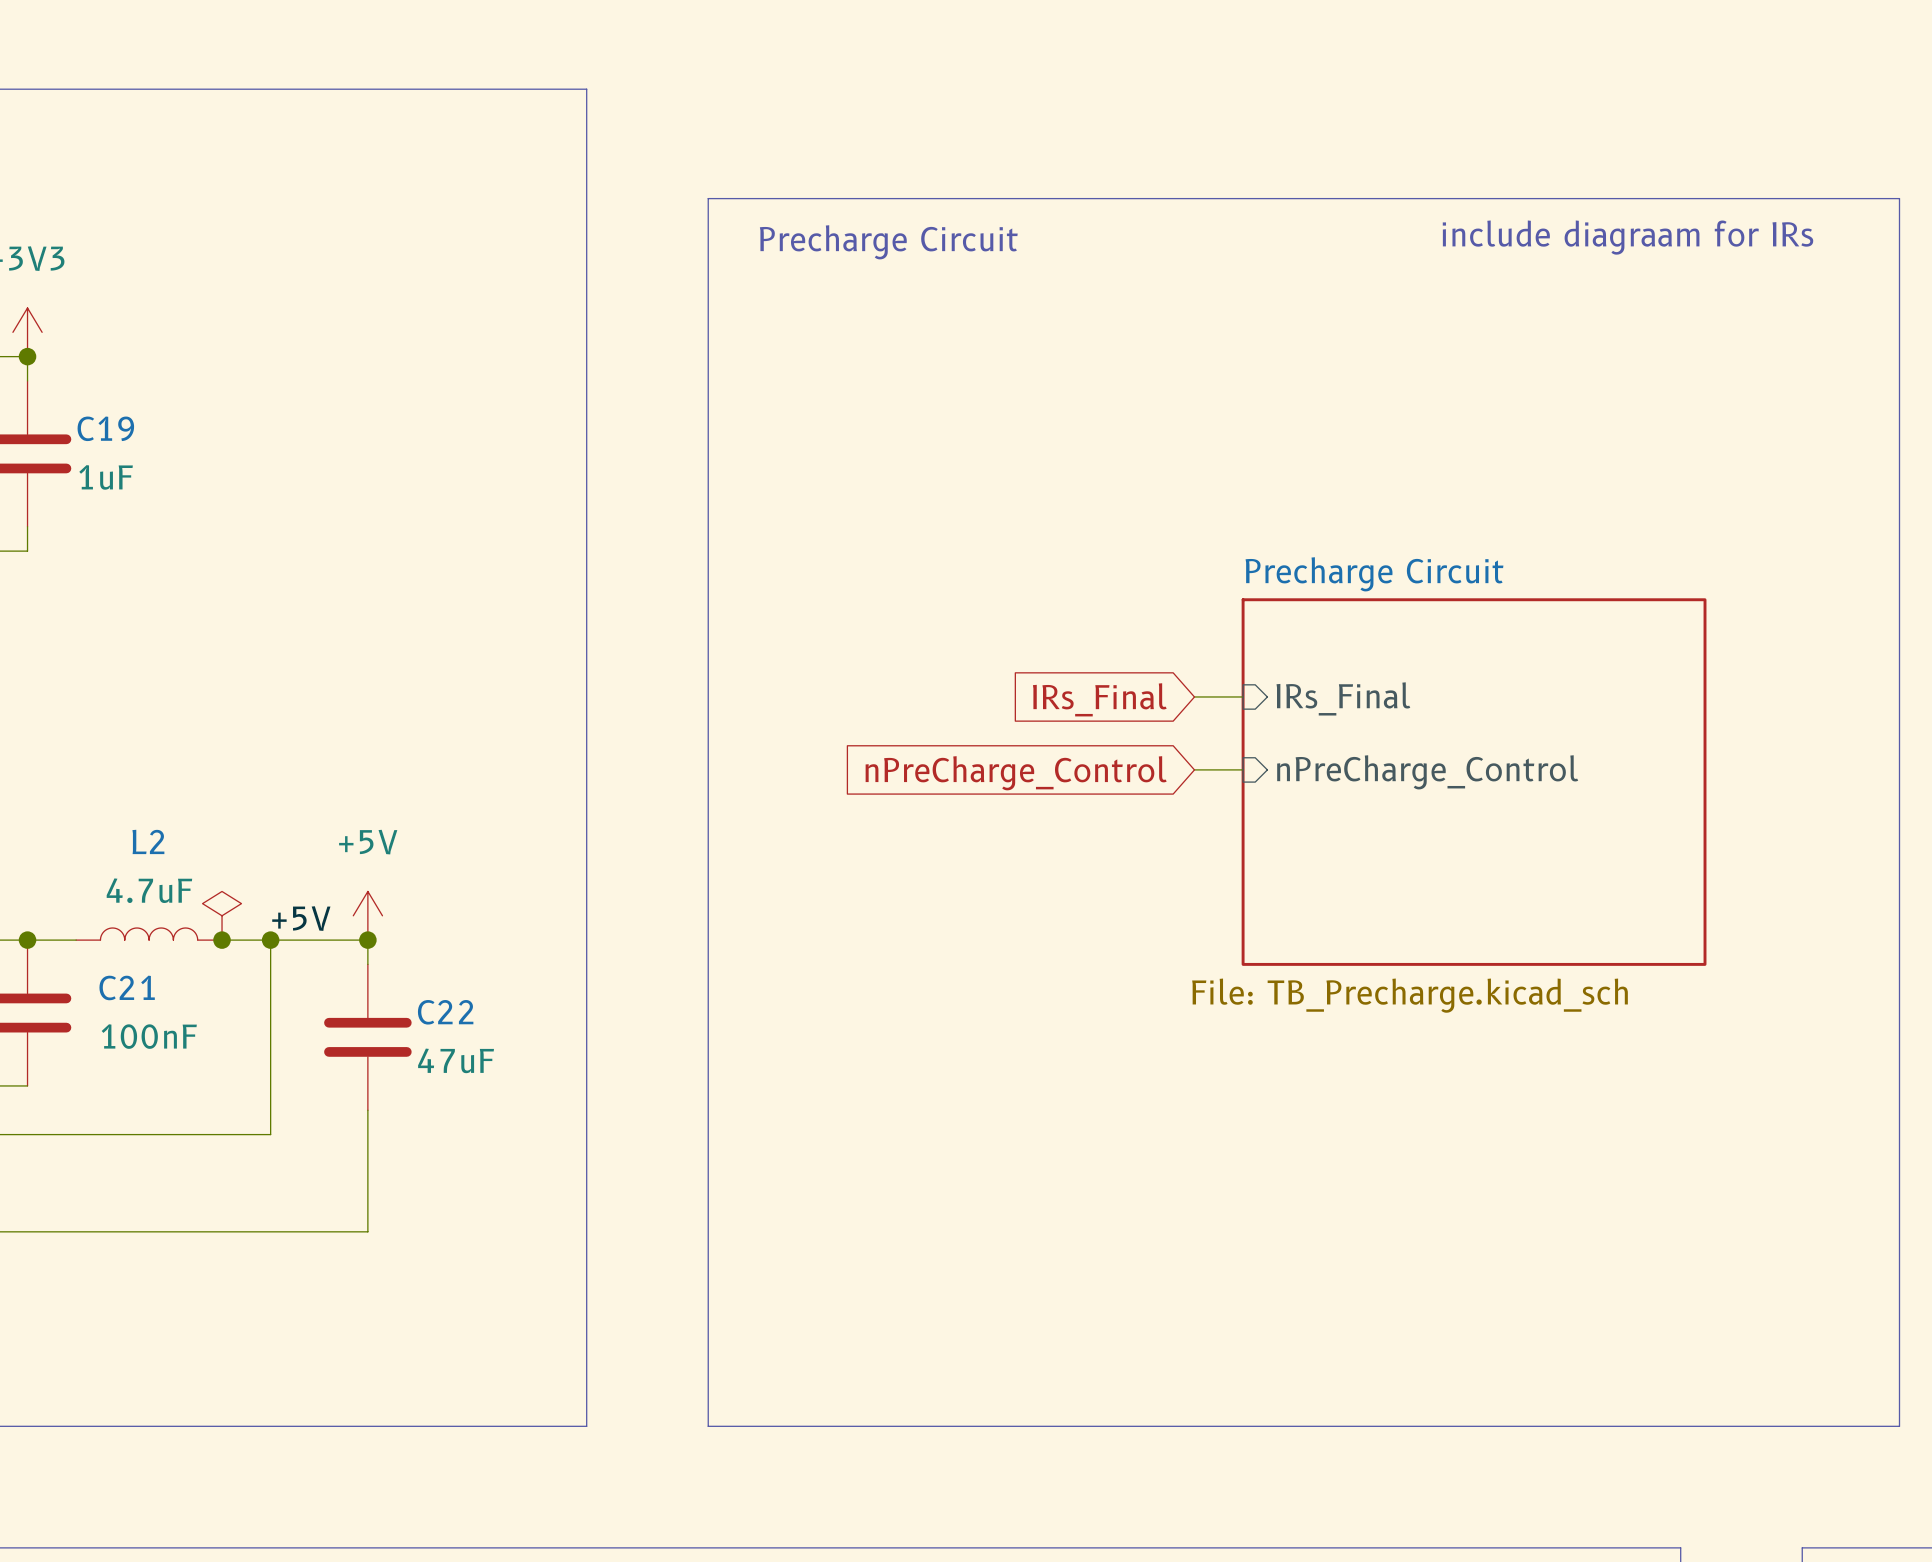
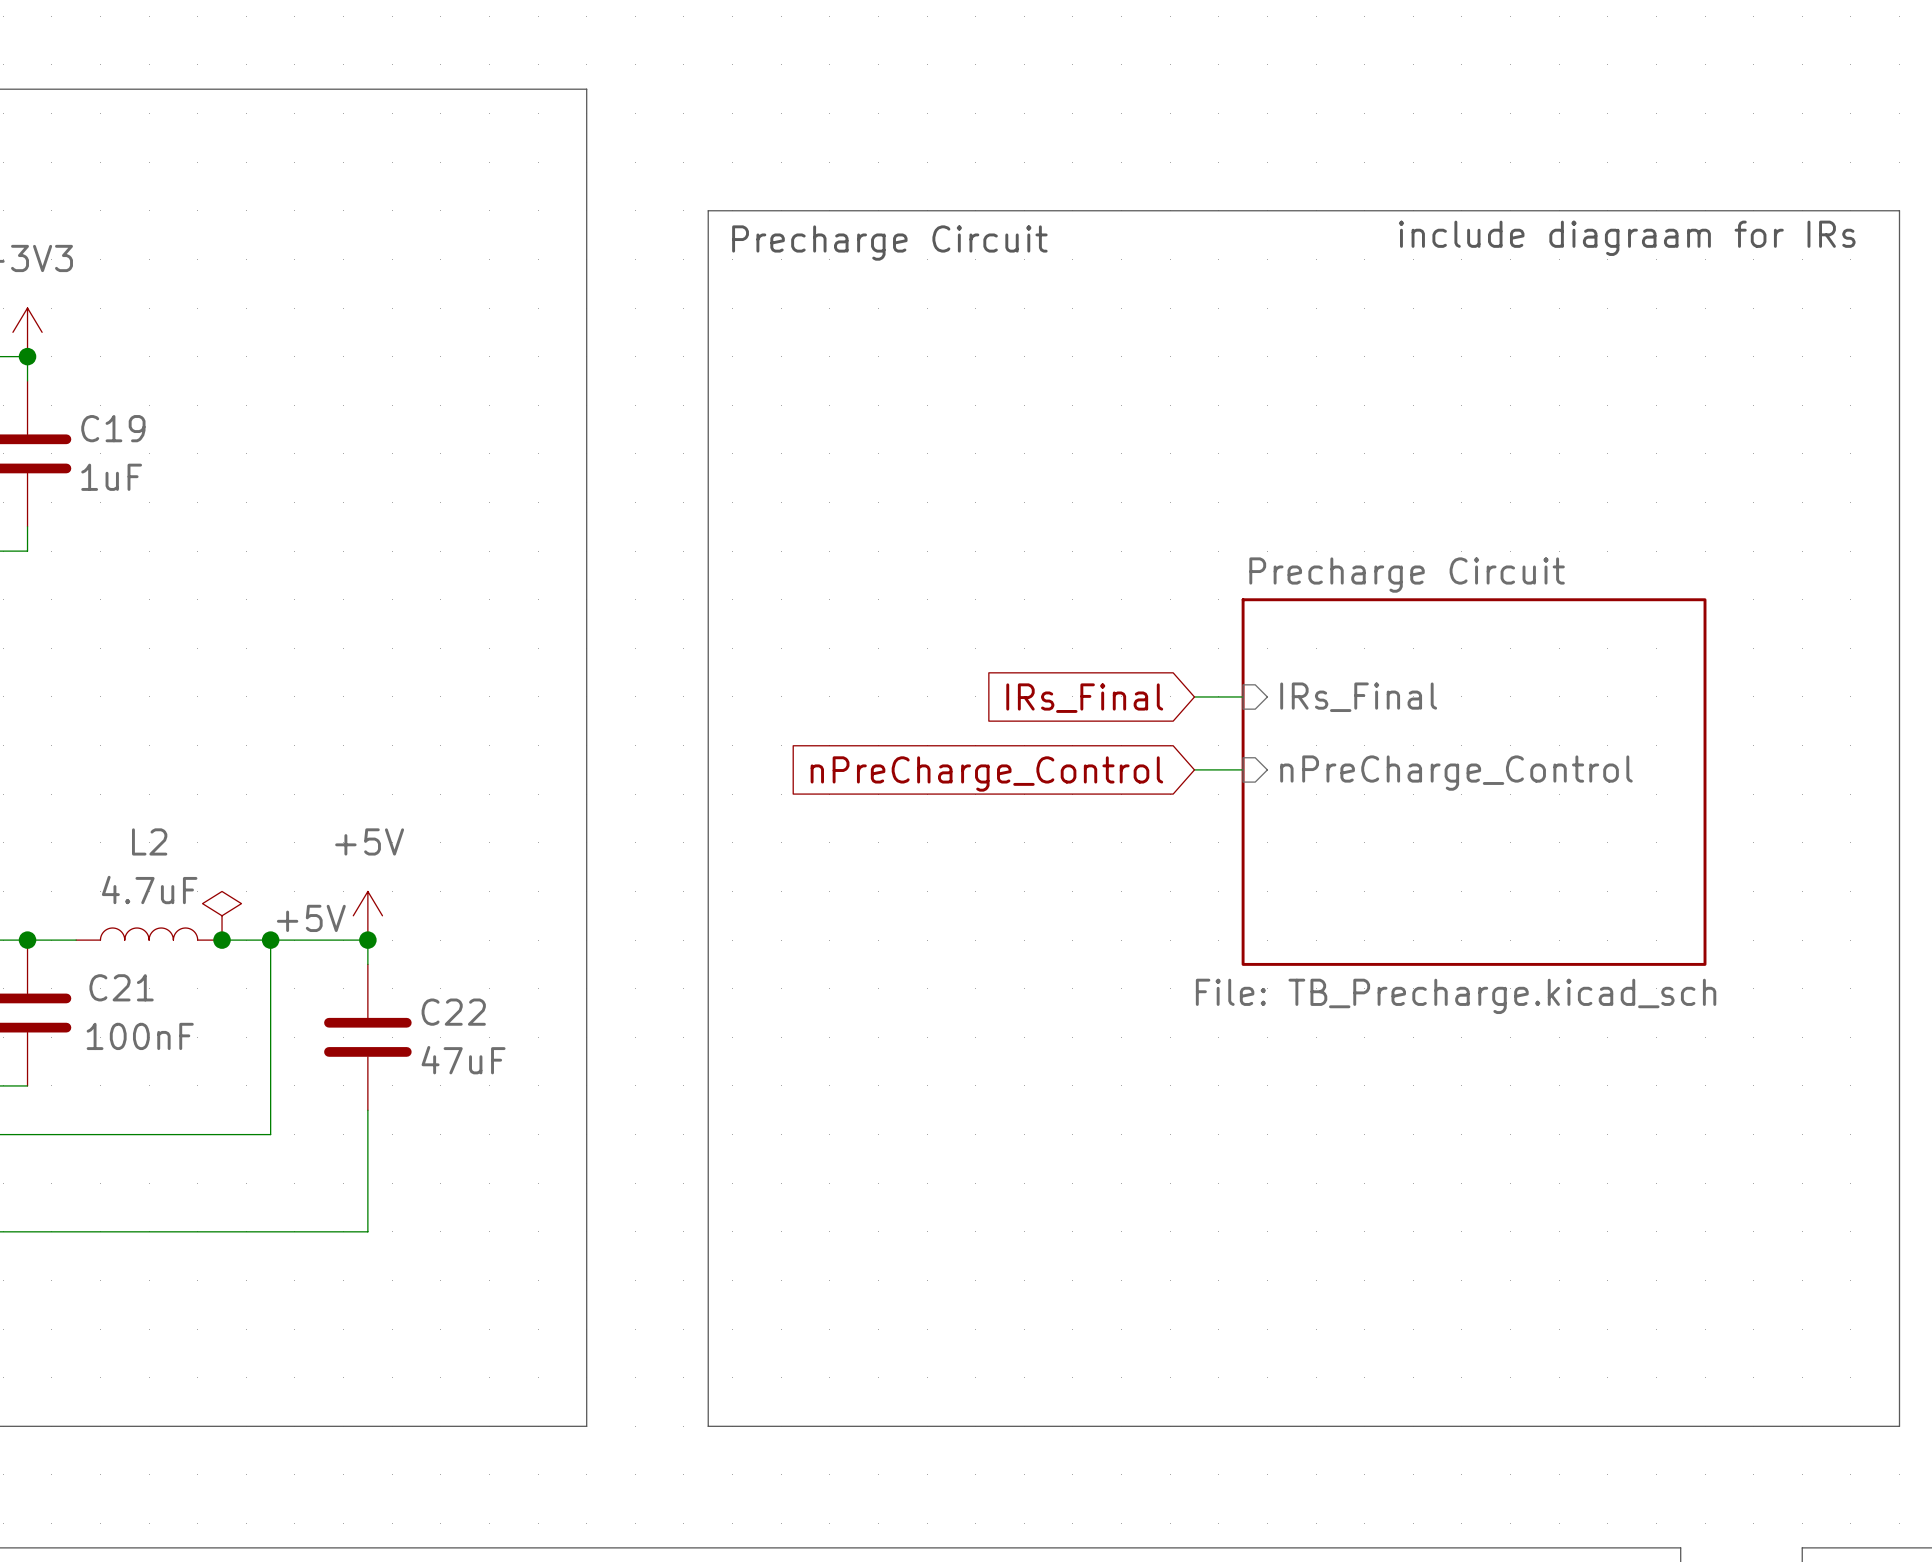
line: (708, 210) (708, 198) (1899, 198) (1899, 210) -> (708, 210) (1899, 210)

